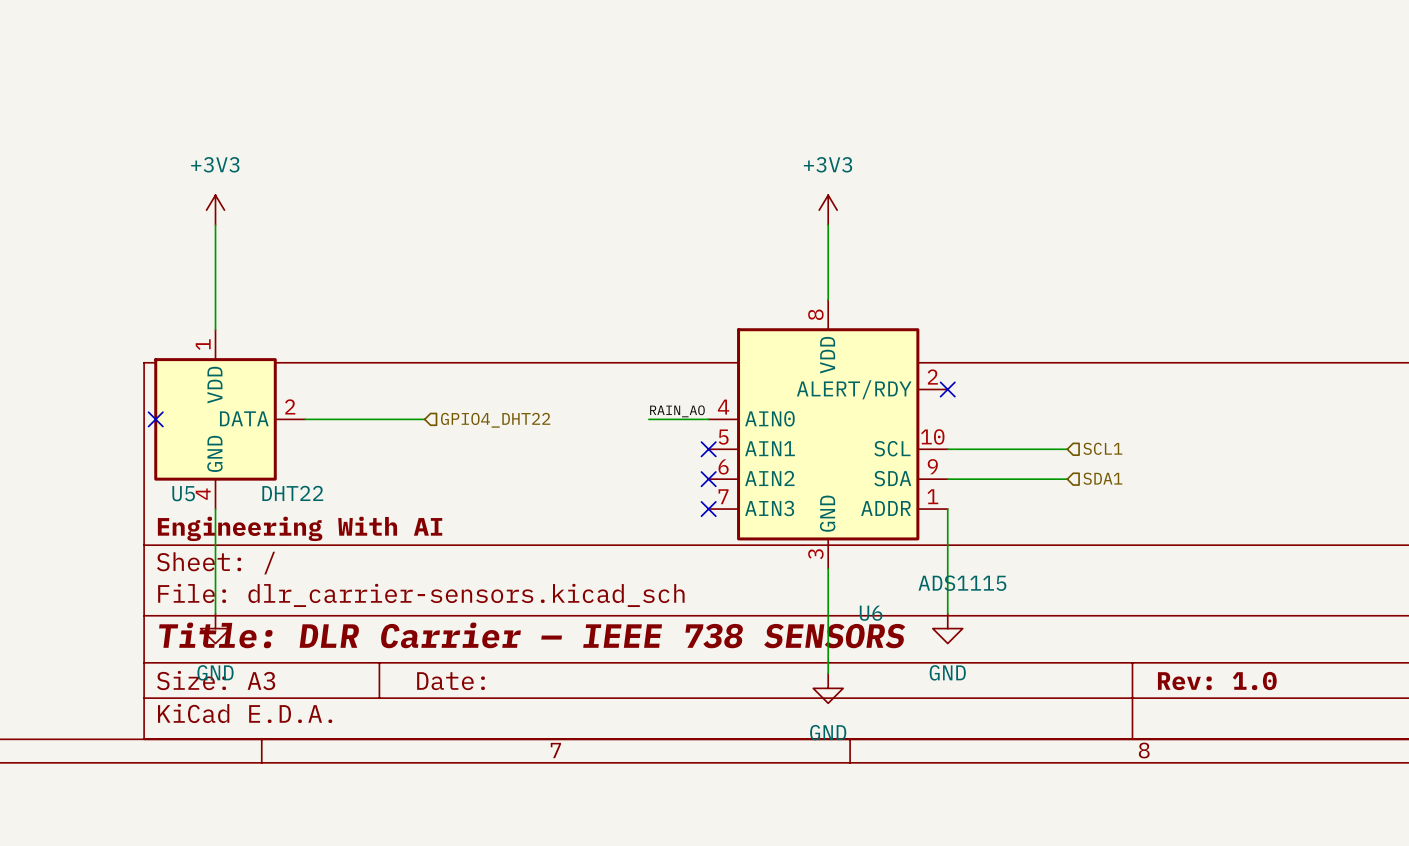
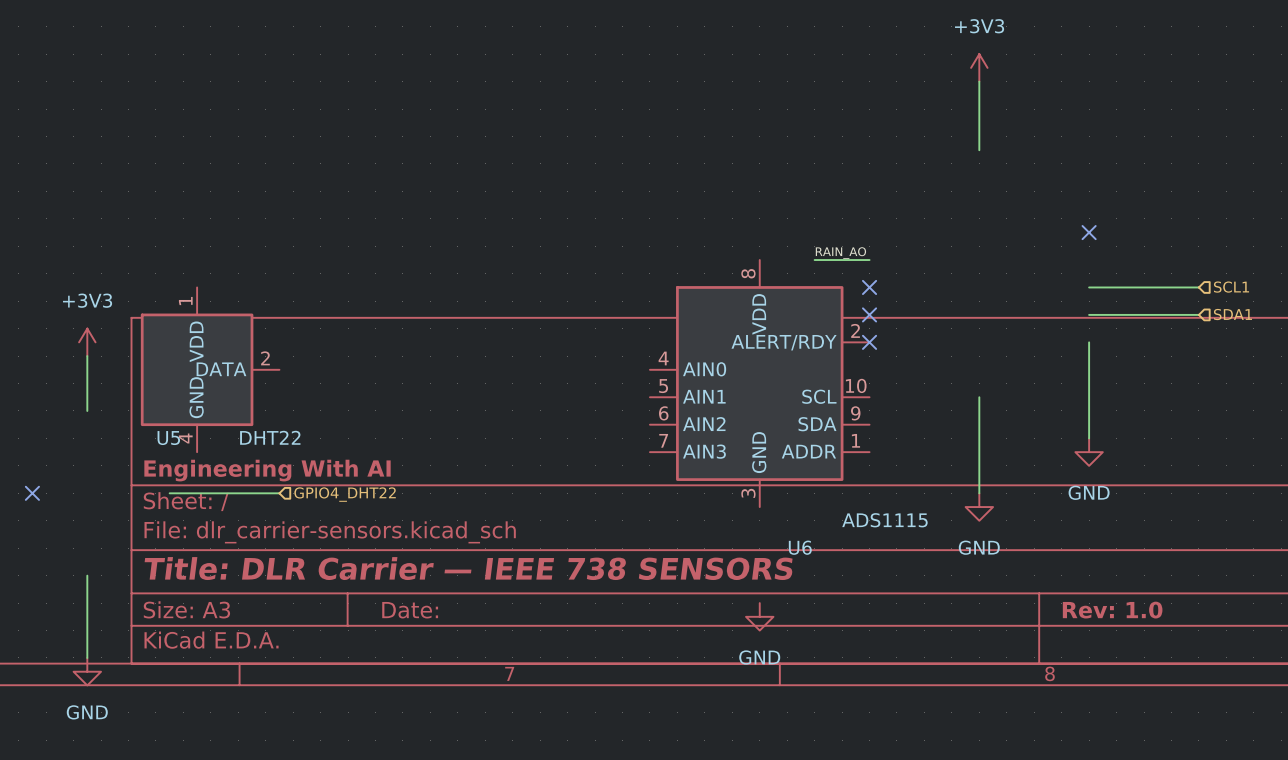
power symbol position: +3V3 (215, 210) -> +3V3 (87, 342)
power symbol position: +3V3 (828, 210) -> +3V3 (979, 67)
wire: (215, 225) (215, 329) -> none
wire: (828, 225) (828, 299) -> (979, 81) (979, 150)
no-connect mark: none -> (1089, 232)
no-connect mark: none -> (869, 287)
wire: none -> (1089, 287) (1198, 287)
no-connect mark: none -> (869, 314)
wire: none -> (87, 356) (87, 410)
label position: RAIN_AO (677, 411) -> RAIN_AO (840, 253)
no-connect mark: (155, 419) -> none
wire: (305, 419) (424, 419) -> (169, 493) (279, 493)
wire: (648, 419) (708, 419) -> (814, 260) (869, 260)
hierarchical label position: GPIO4_DHT22 (495, 420) -> GPIO4_DHT22 (345, 494)
hierarchical label position: SCL1 (1102, 448) -> SCL1 (1231, 287)
no-connect mark: (708, 449) -> none
wire: (947, 449) (1067, 449) -> (979, 493) (979, 397)
hierarchical label position: SDA1 (1102, 478) -> SDA1 (1232, 314)
no-connect mark: (708, 479) -> none
wire: (947, 479) (1067, 479) -> (1089, 314) (1198, 314)
wire: (215, 509) (215, 613) -> none
no-connect mark: (708, 509) -> none
wire: (947, 509) (947, 613) -> (1089, 342) (1089, 438)
power symbol: none -> GND (1089, 452)
no-connect mark: none -> (32, 493)
wire: (828, 568) (828, 673) -> none
power symbol: none -> GND (979, 507)
power symbol position: GND (215, 628) -> GND (87, 671)
power symbol: GND (947, 628) -> none
wire: none -> (87, 575) (87, 657)

